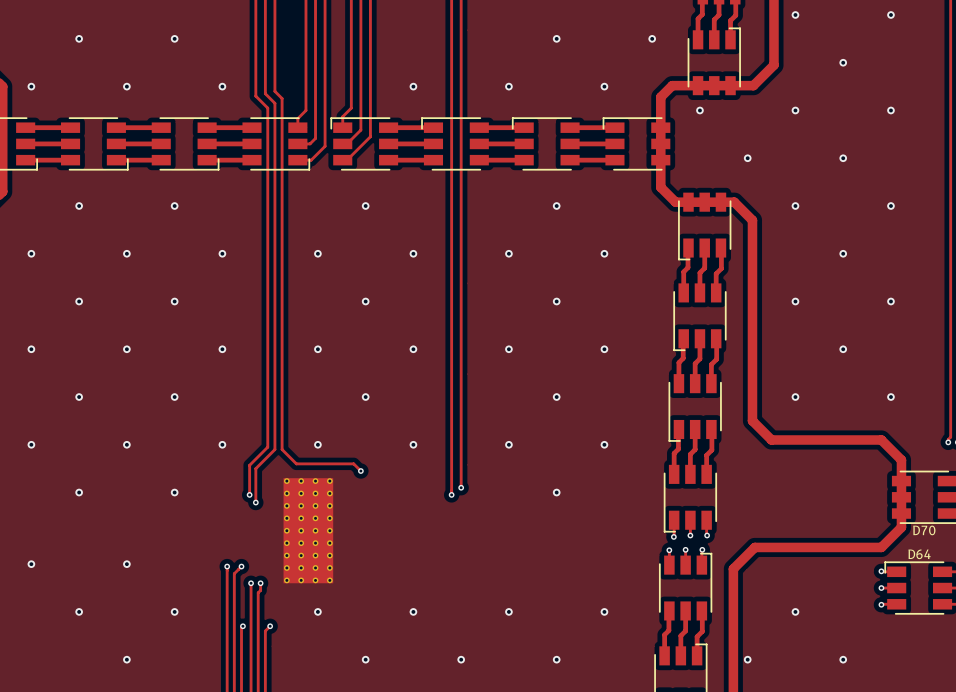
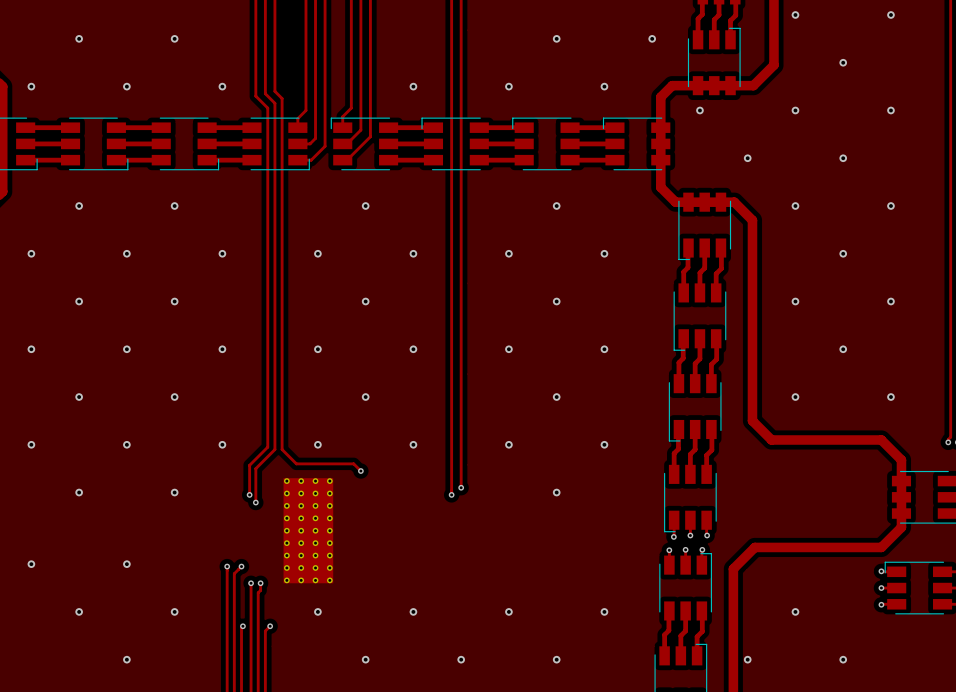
D70 name: D70 (924, 530) -> none
D64 name: D64 (919, 554) -> none

